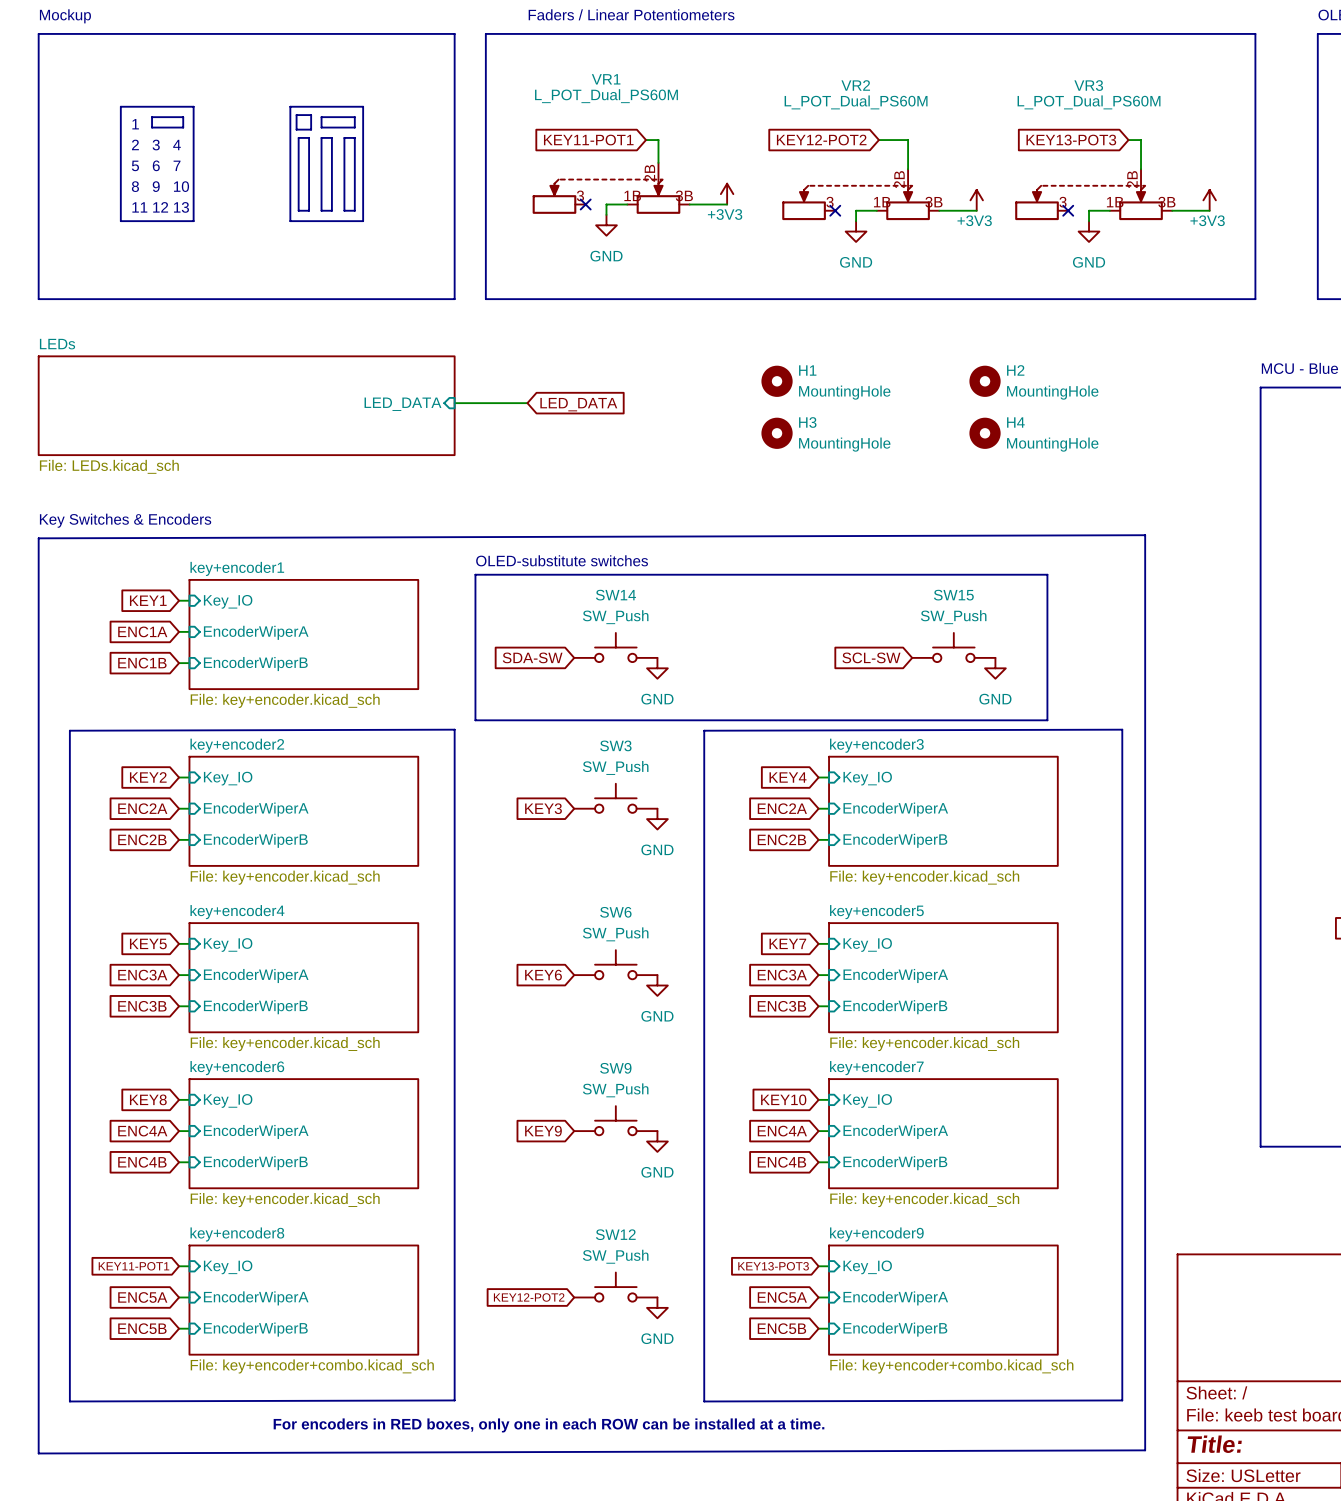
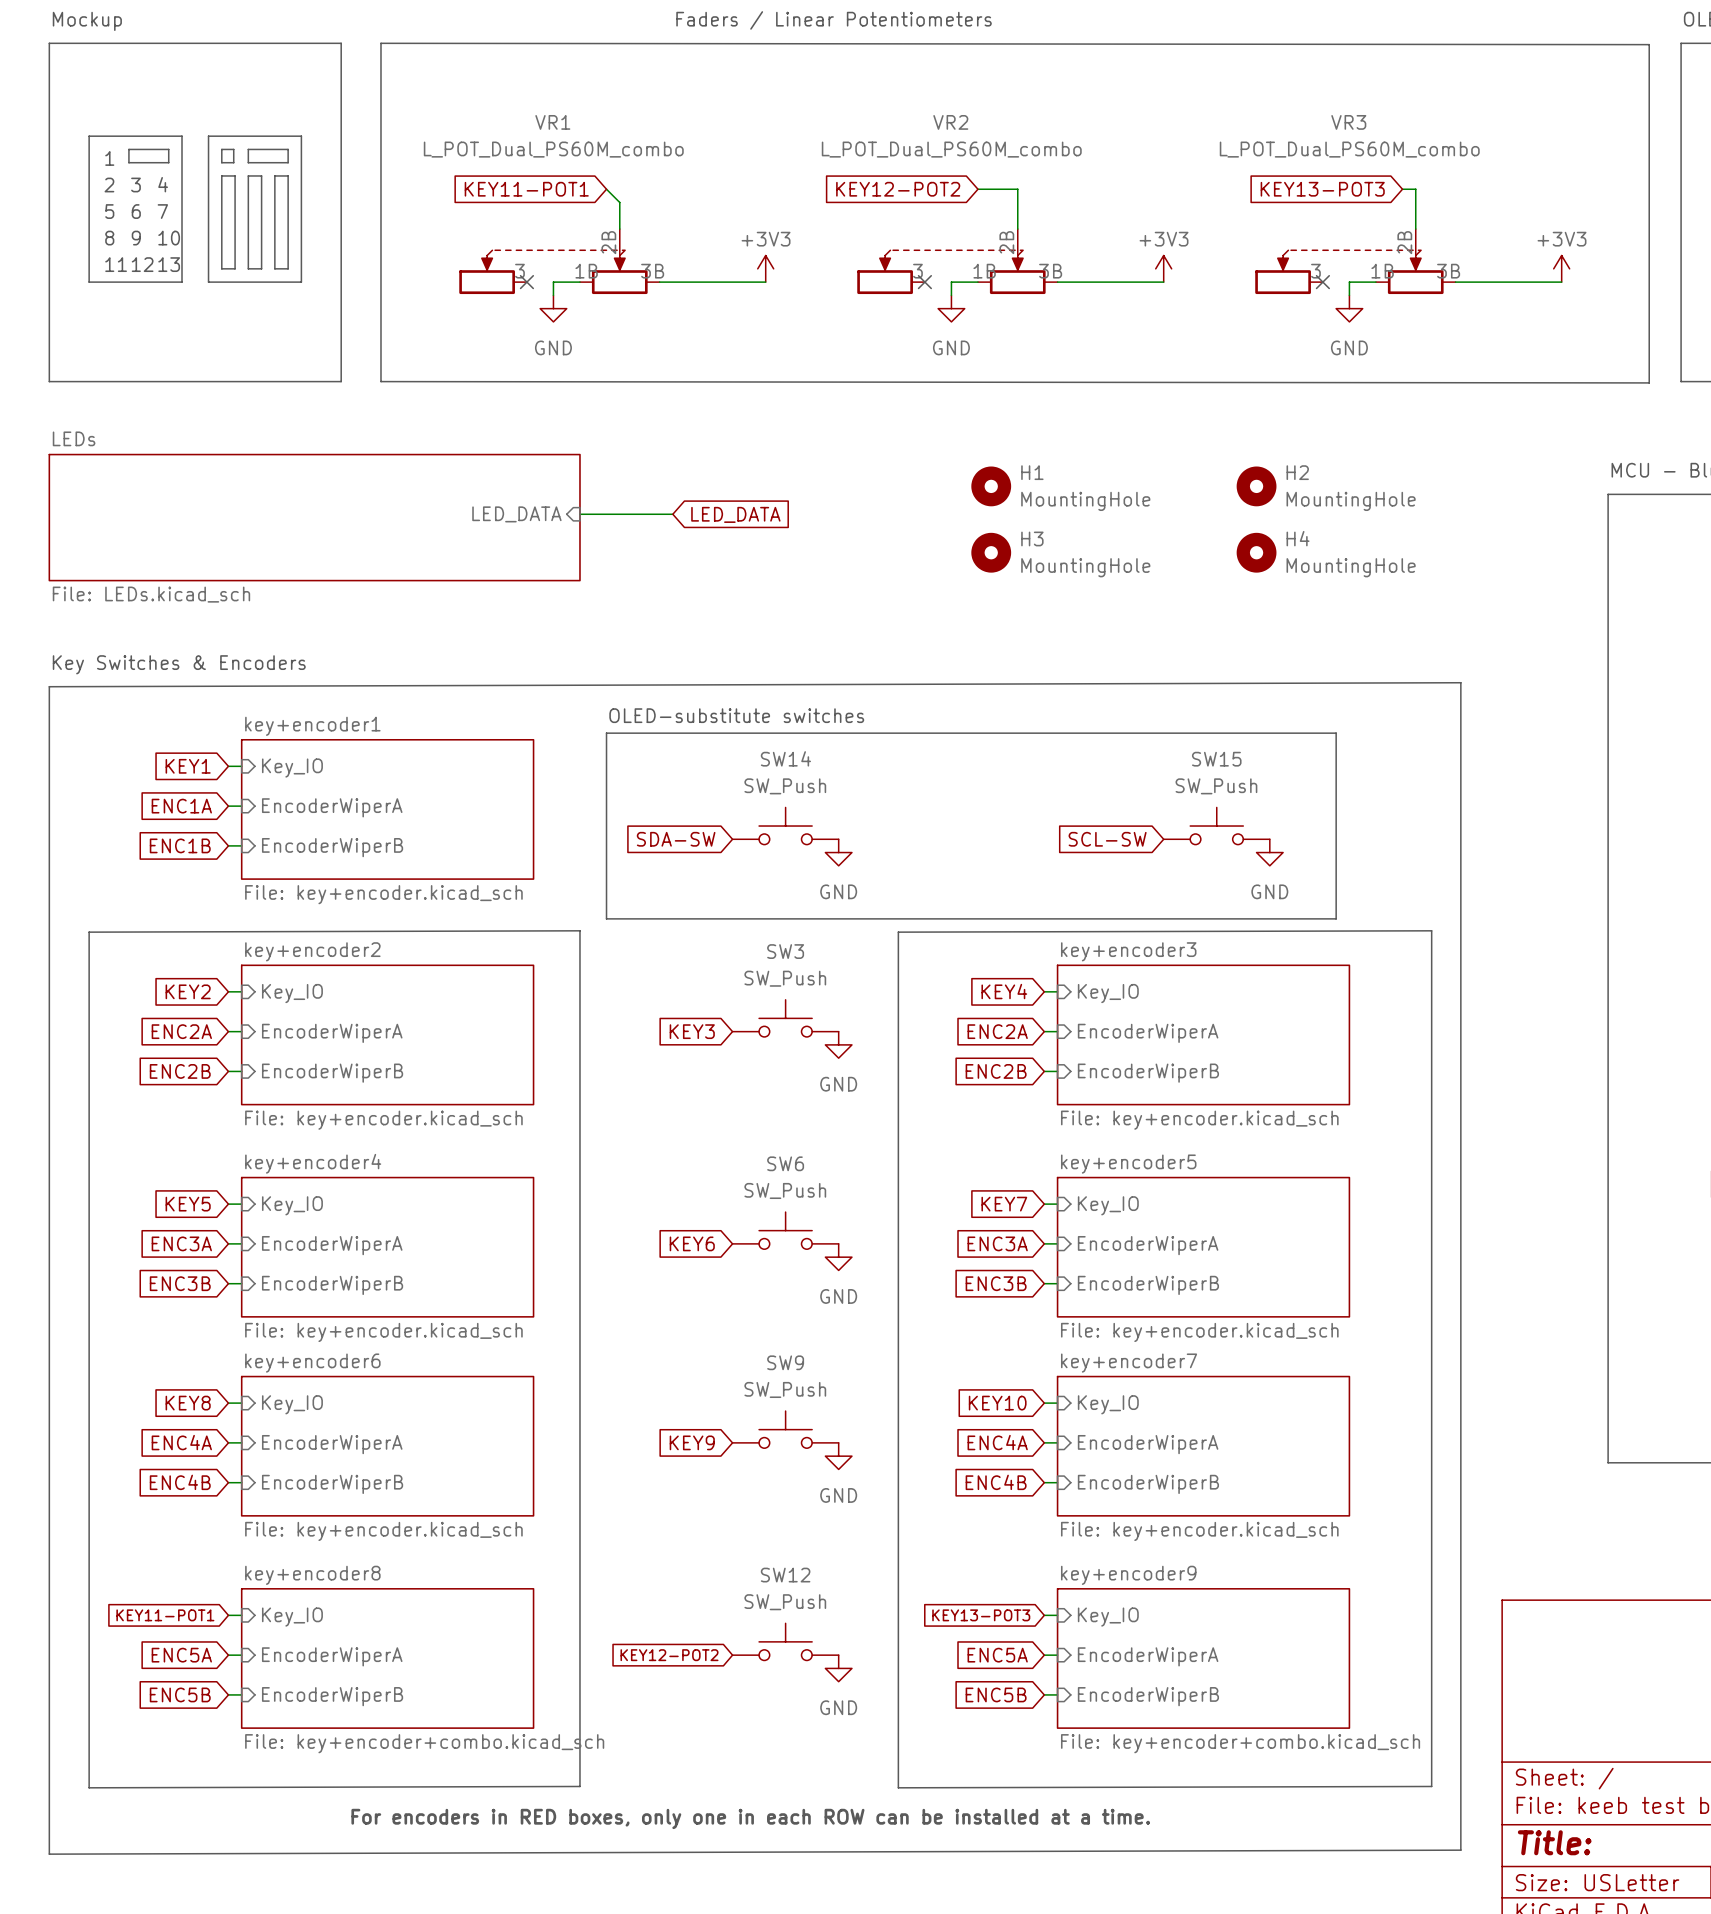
line: (267, 33) (454, 33) (454, 299) (267, 299) -> (341, 43) (341, 381)
line: (485, 33) (1255, 33) (1255, 299) (485, 299) (485, 33) -> none
VR1 value: L_POT_Dual_PS60M (606, 96) -> L_POT_Dual_PS60M_combo (553, 149)
VR2 value: L_POT_Dual_PS60M (856, 102) -> L_POT_Dual_PS60M_combo (951, 149)
VR3 value: L_POT_Dual_PS60M (1089, 102) -> L_POT_Dual_PS60M_combo (1349, 149)
line: (120, 106) (120, 221) -> (154, 136) (89, 136) (89, 282) (154, 282)
line: (142, 106) (163, 106) -> (182, 136) (182, 282)
line: (193, 106) (193, 221) -> (247, 136) (301, 136) (301, 282) (247, 282)
line: (290, 106) (363, 106) (363, 221) (290, 221) (290, 106) -> none
line: (296, 115) (311, 115) (311, 129) (296, 129) (296, 115) -> none
line: none -> (128, 149) (168, 149) (168, 162) (128, 162) (128, 149)
line: (173, 117) (152, 117) (152, 127) (173, 127) -> (221, 149) (221, 162)
line: none -> (248, 149) (288, 149) (288, 162) (248, 162) (248, 149)
line: (321, 117) (354, 117) (354, 127) (321, 127) (321, 117) -> none
text position: 1 (135, 124) -> 1 (109, 158)
line: none -> (221, 175) (235, 175) (235, 268) (221, 268) (221, 175)
line: (298, 137) (309, 137) (309, 210) (298, 210) -> (380, 175) (380, 43) (1649, 44) (1649, 382) (380, 381) (380, 268)
line: (321, 137) (331, 137) (331, 210) (321, 210) (321, 137) -> (274, 175) (288, 175) (288, 268) (274, 268) (274, 175)
line: (344, 137) (354, 137) (354, 210) (344, 210) (344, 137) -> (248, 175) (261, 175) (261, 268) (248, 268) (248, 175)
global label position: KEY11-POT1 (588, 140) -> KEY11-POT1 (526, 189)
wire: (646, 140) (658, 140) (658, 162) -> none
global label position: KEY12-POT2 (821, 140) -> KEY12-POT2 (898, 189)
wire: (878, 140) (908, 140) (908, 169) -> none
global label position: KEY13-POT3 (1071, 140) -> KEY13-POT3 (1322, 189)
wire: (1128, 140) (1141, 140) (1141, 169) -> none
text position: 2 (135, 144) -> 2 (109, 185)
text position: 3 (156, 145) -> 3 (135, 185)
text position: 4 (176, 145) -> 4 (163, 184)
wire: none -> (606, 189) (619, 202) (619, 229)
wire: none -> (977, 189) (1017, 189) (1017, 229)
wire: none -> (1402, 189) (1415, 189) (1415, 229)
text position: 5 (135, 165) -> 5 (109, 211)
text position: 6 (156, 165) -> 6 (136, 211)
text position: 7 (177, 165) -> 7 (162, 211)
text position: 8 (135, 186) -> 8 (109, 238)
text position: 9 (156, 186) -> 9 (136, 238)
text position: 10 (181, 186) -> 10 (169, 238)
VR1 position: (611, 188) -> (559, 261)
power symbol: +3V3 (727, 194) -> none
VR2 position: (860, 194) -> (957, 261)
VR3 position: (1093, 194) -> (1355, 261)
power symbol position: +3V3 (976, 200) -> +3V3 (1163, 268)
power symbol position: +3V3 (1209, 200) -> +3V3 (1561, 268)
no-connect mark: (585, 204) -> none
wire: (627, 204) (606, 204) (606, 214) -> (579, 282) (553, 282) (553, 295)
wire: (689, 204) (727, 204) -> none
text position: 11 (139, 207) -> 11 (116, 264)
text position: 12 (160, 207) -> 12 (142, 264)
text position: 13 (181, 207) -> 13 (169, 264)
power symbol: none -> +3V3 (765, 268)
no-connect mark: (835, 210) -> none
wire: (876, 210) (856, 210) (856, 221) -> (977, 282) (951, 282) (951, 295)
wire: (939, 210) (976, 210) -> none
no-connect mark position: (1068, 210) -> (1322, 282)
wire: (1109, 210) (1089, 210) (1089, 221) -> (1375, 282) (1349, 282) (1349, 295)
wire: (1172, 210) (1209, 210) -> none
power symbol text position: +3V3 (974, 220) -> +3V3 (1164, 239)
power symbol text position: +3V3 (1207, 220) -> +3V3 (1561, 239)
line: (142, 221) (163, 221) -> (208, 136) (208, 282)
no-connect mark: none -> (526, 282)
wire: none -> (659, 282) (765, 282)
no-connect mark: none -> (924, 282)
wire: none -> (1057, 282) (1163, 282)
wire: none -> (1455, 282) (1561, 282)
power symbol: GND (606, 225) -> none
power symbol: GND (856, 231) -> none
power symbol position: GND (1089, 231) -> GND (1349, 308)
power symbol: none -> GND (553, 308)
power symbol: none -> GND (951, 308)

